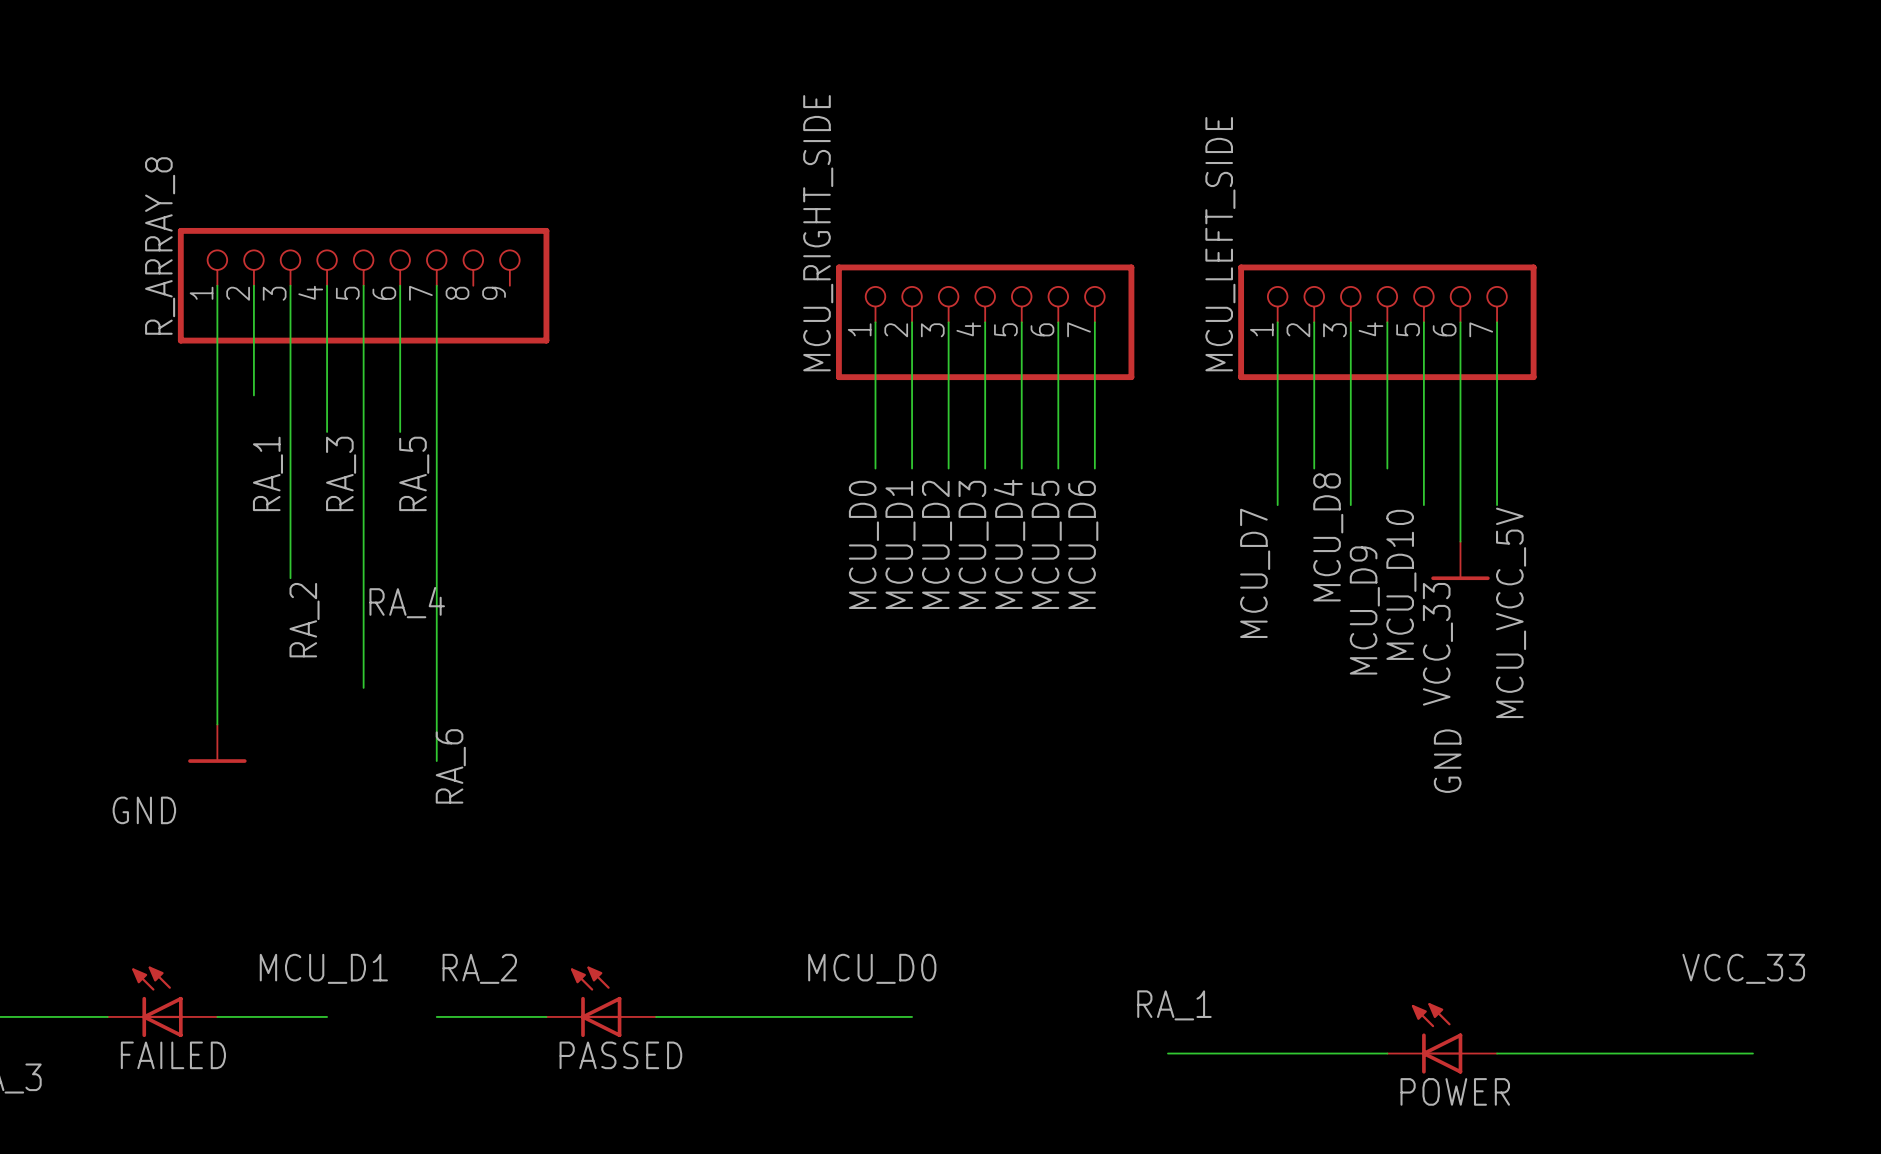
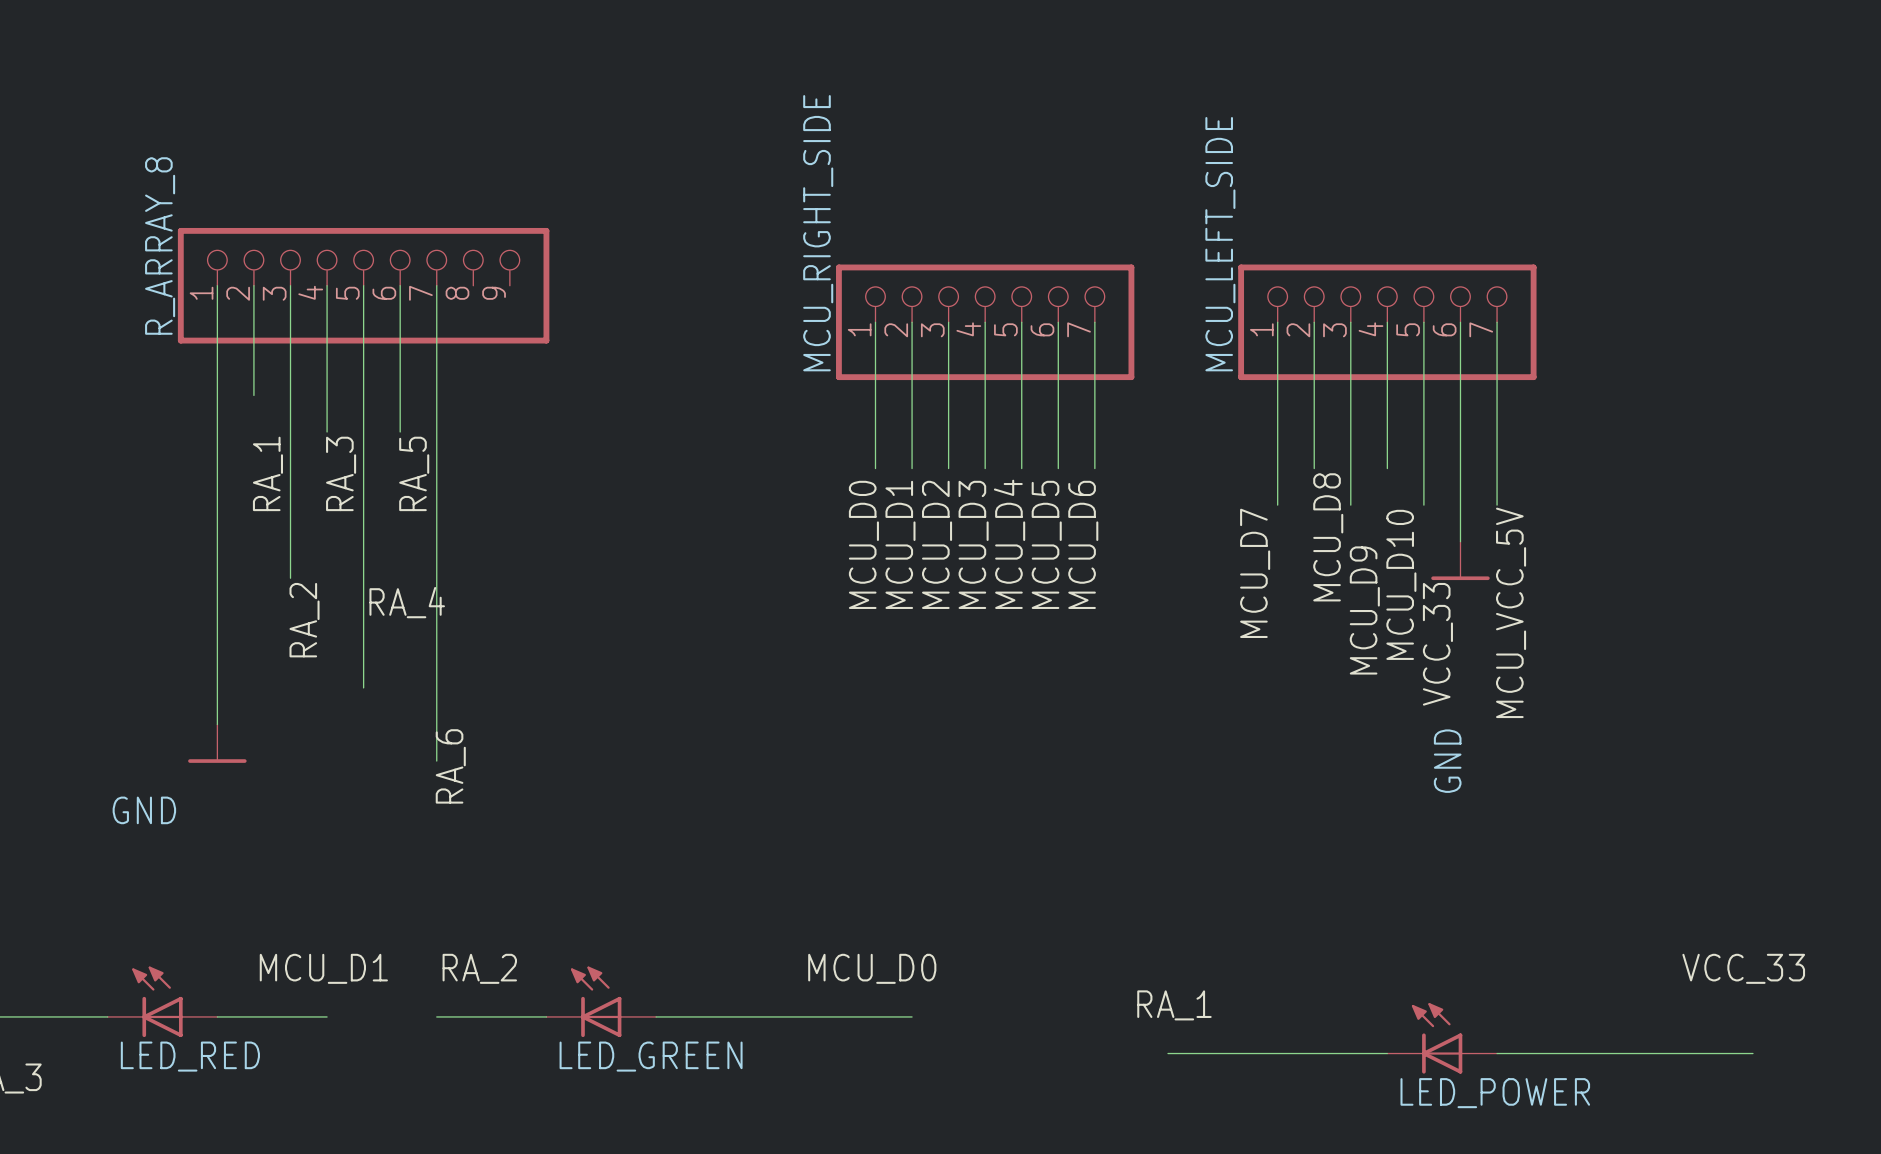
FAILED name: FAILED (173, 1055) -> LED_RED (190, 1056)
PASSED name: PASSED (620, 1055) -> LED_GREEN (651, 1056)
POWER name: POWER (1455, 1091) -> LED_POWER (1495, 1093)

